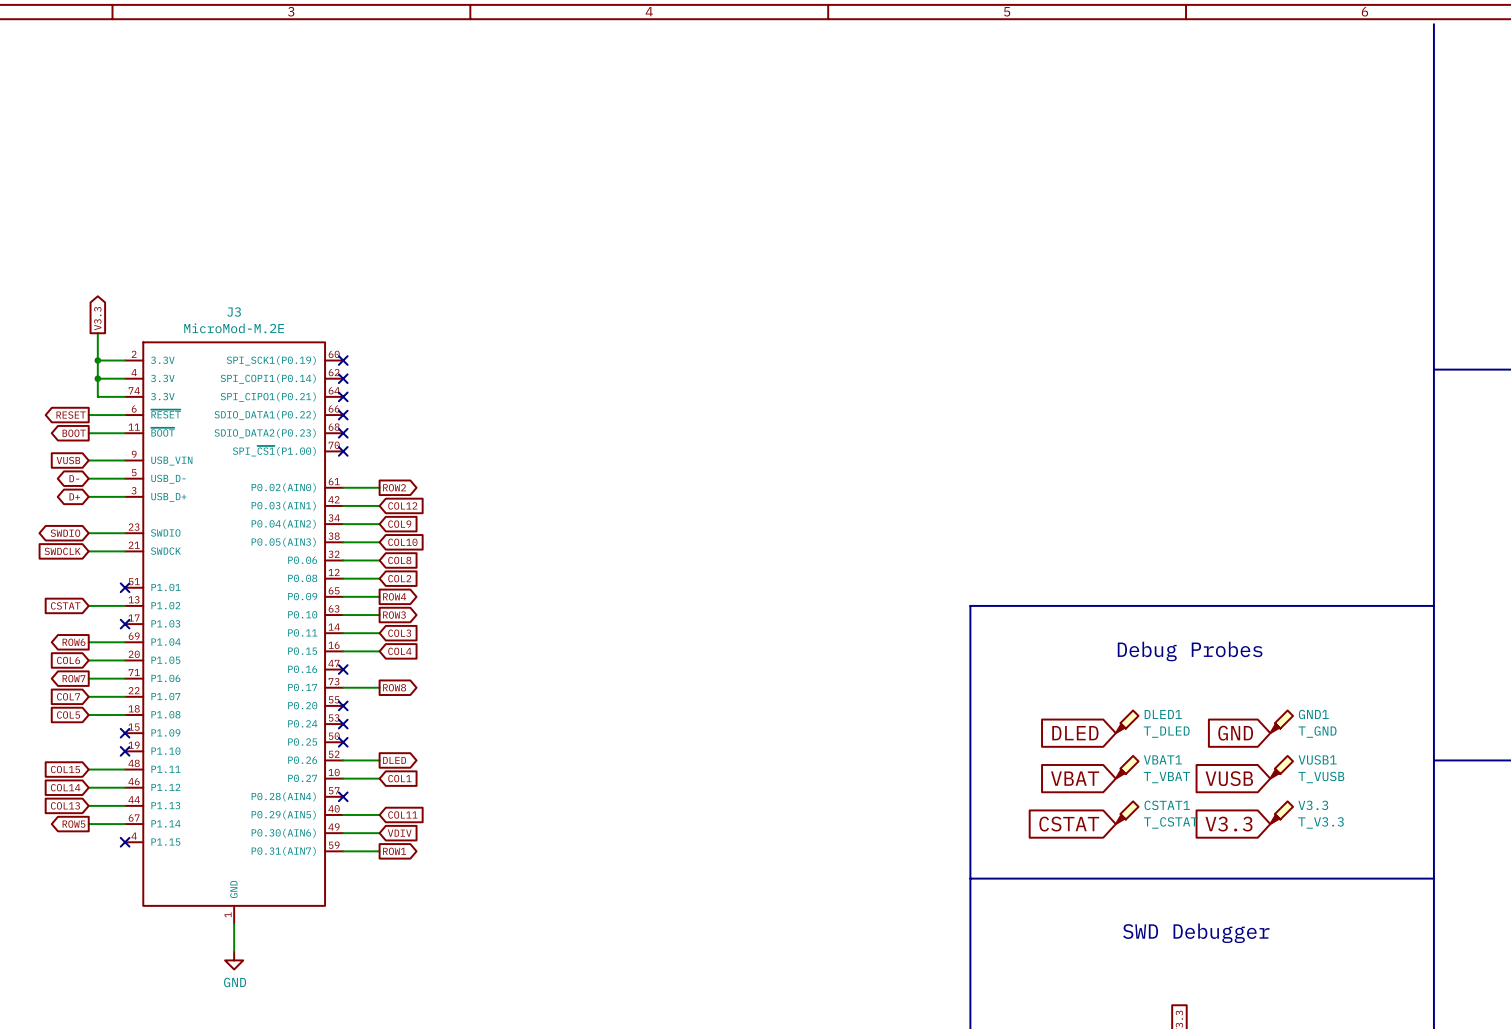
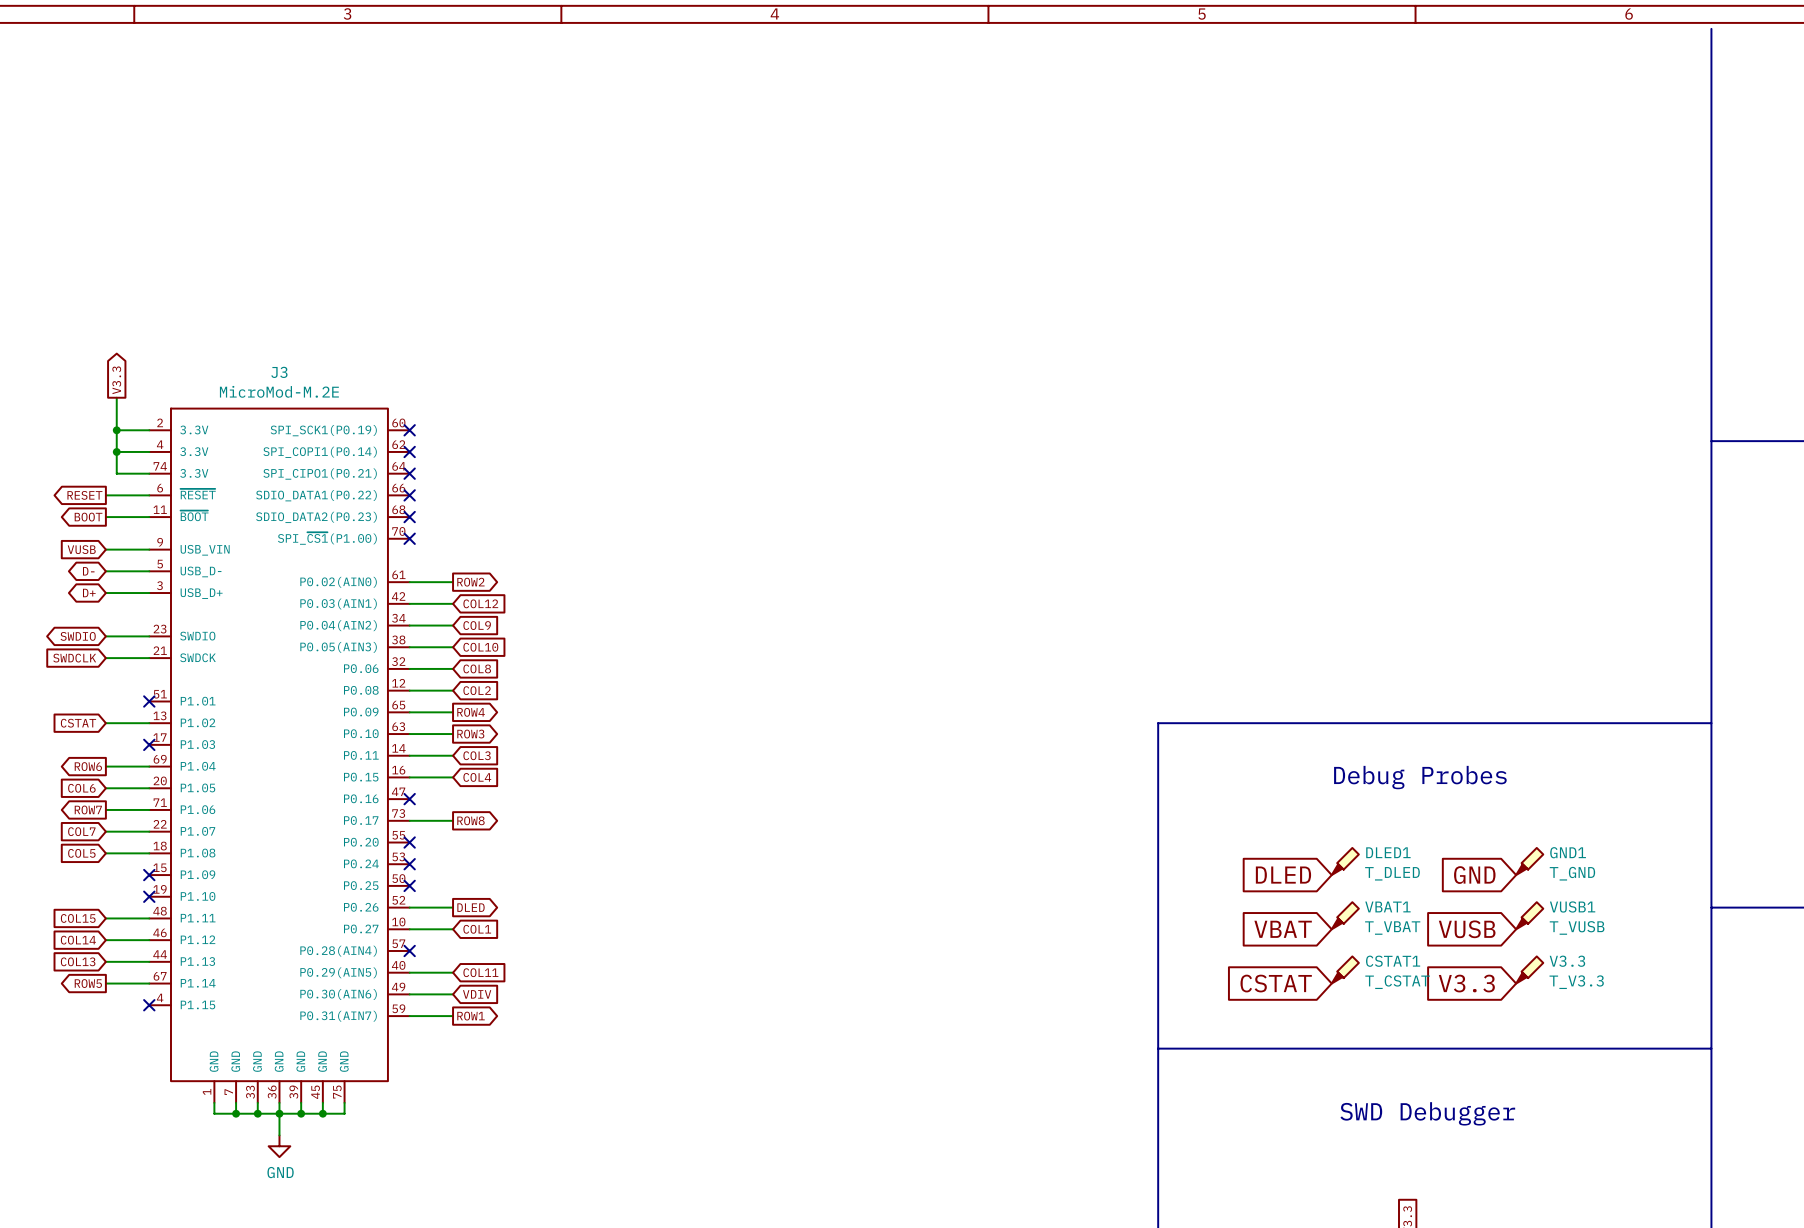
J3 symbol: [125, 342, 344, 925] -> [149, 408, 410, 1103]
wire: none -> (214, 1102) (214, 1113) (344, 1113) (344, 1102)
wire: none -> (236, 1102) (236, 1113)
wire: none -> (257, 1102) (257, 1113)
wire: none -> (301, 1102) (301, 1113)
wire: none -> (322, 1102) (322, 1113)
junction: none -> (236, 1113)
junction: none -> (257, 1113)
junction: none -> (279, 1113)
junction: none -> (301, 1113)
junction: none -> (322, 1113)

